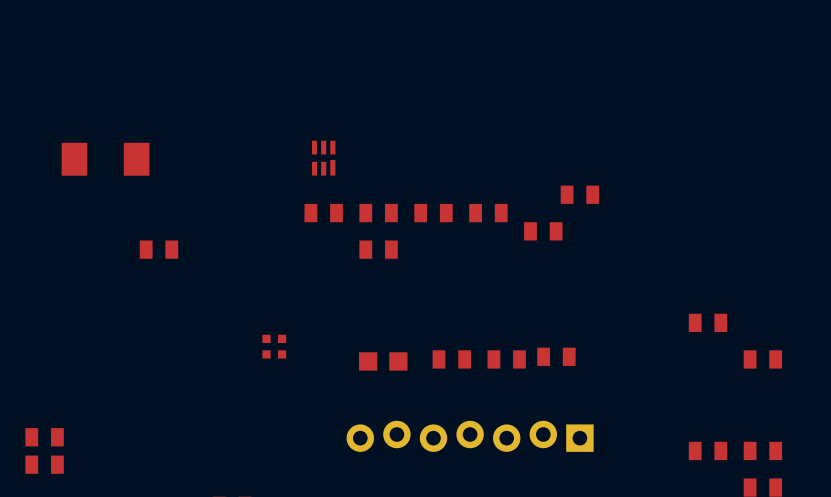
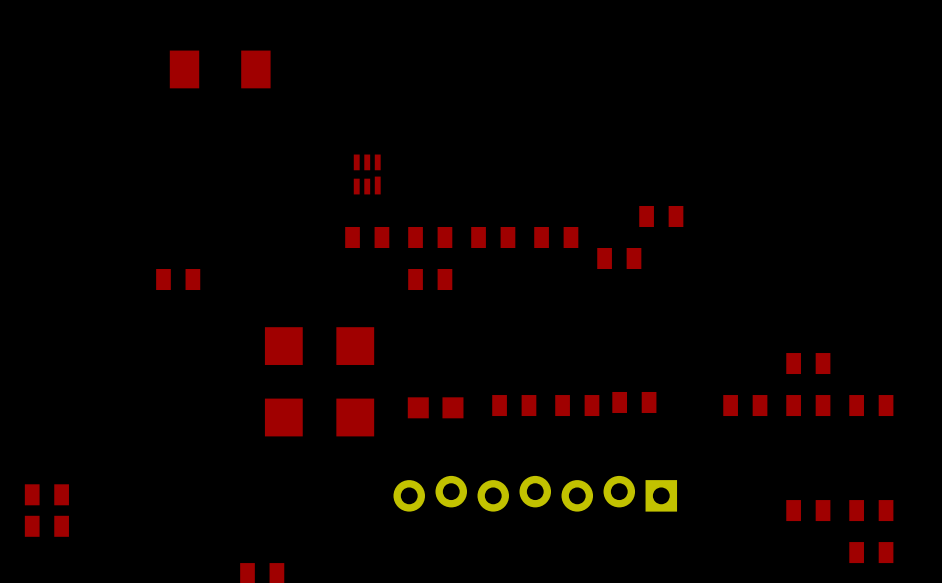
part position: (105, 159) -> (220, 69)
part footprint: [262, 334, 287, 359] -> [264, 327, 375, 437]
part: none -> (745, 405)
part: none -> (808, 405)

